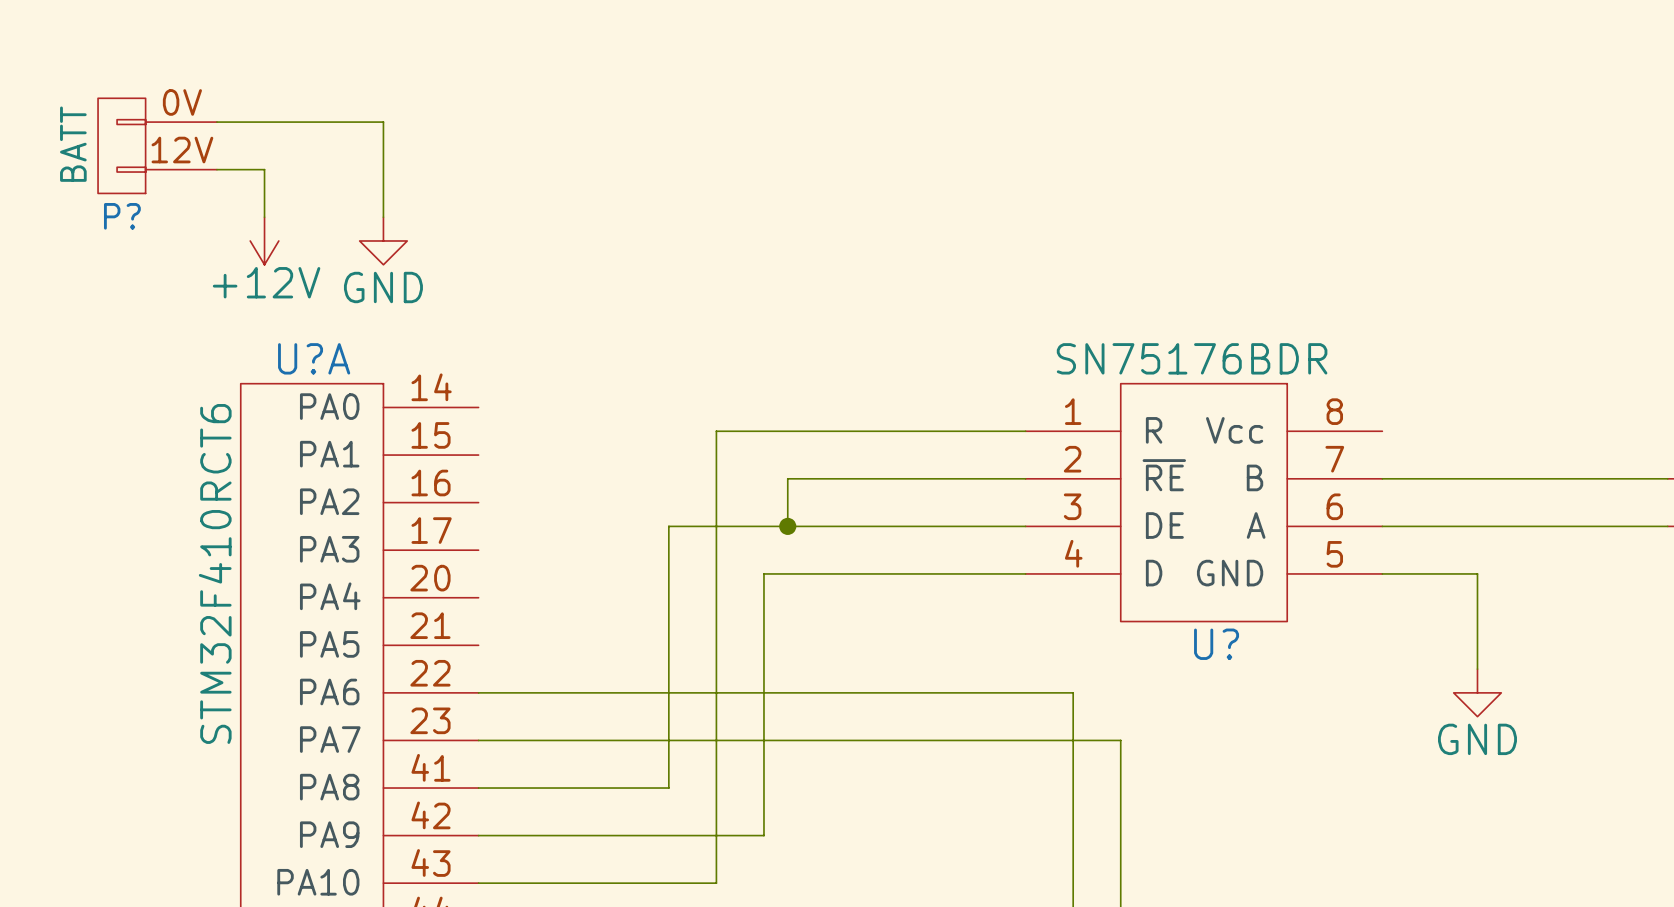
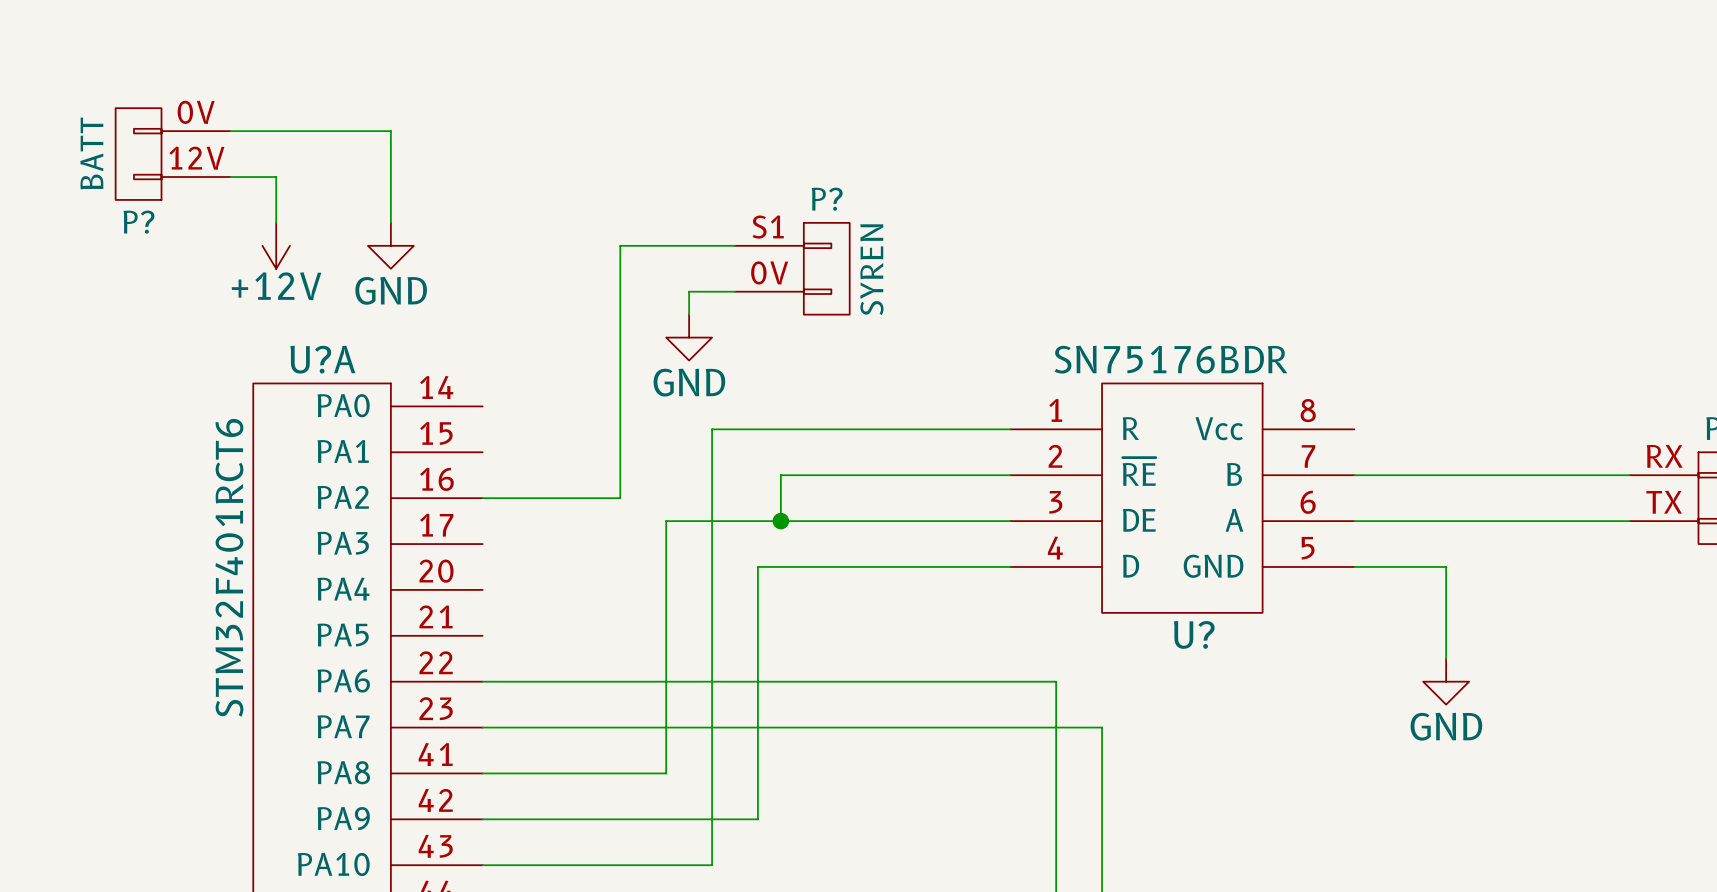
wire: none -> (735, 245) (620, 245) (620, 498) (482, 498)
P?: none -> SYREN (792, 268)
wire: none -> (735, 291) (689, 291) (689, 314)
power symbol: none -> GND (689, 337)
U?A value: STM32F410RCT6 (215, 573) -> STM32F401RCT6 (229, 567)

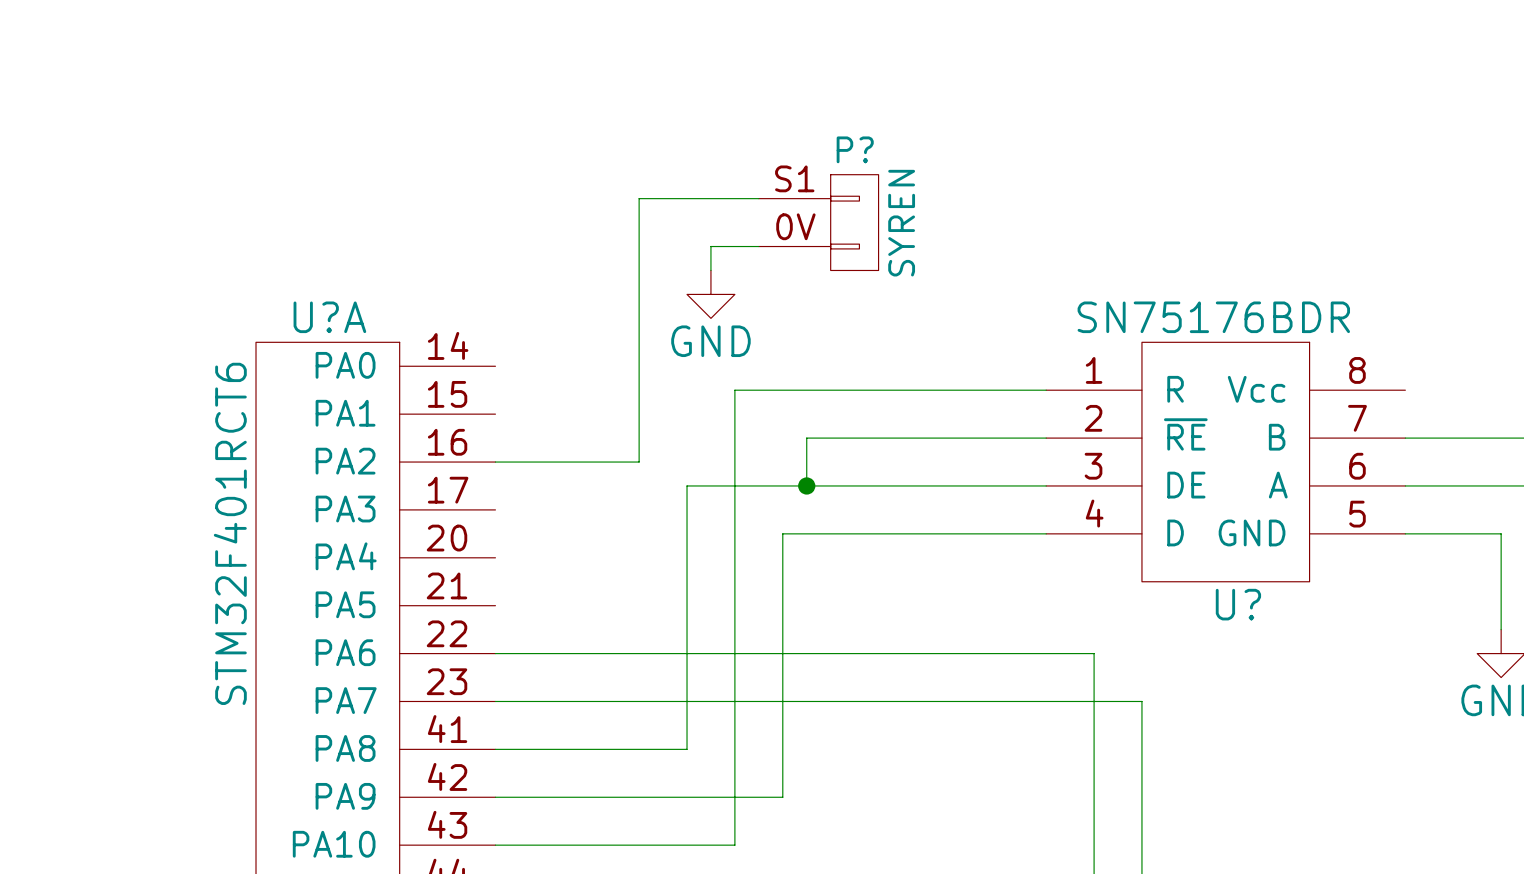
wire: (230, 131) (390, 131) (390, 222) -> none
P?: BATT (172, 154) -> none
wire: (230, 177) (276, 177) (276, 222) -> none
power symbol: +12V (276, 245) -> none
power symbol: GND (390, 245) -> none

